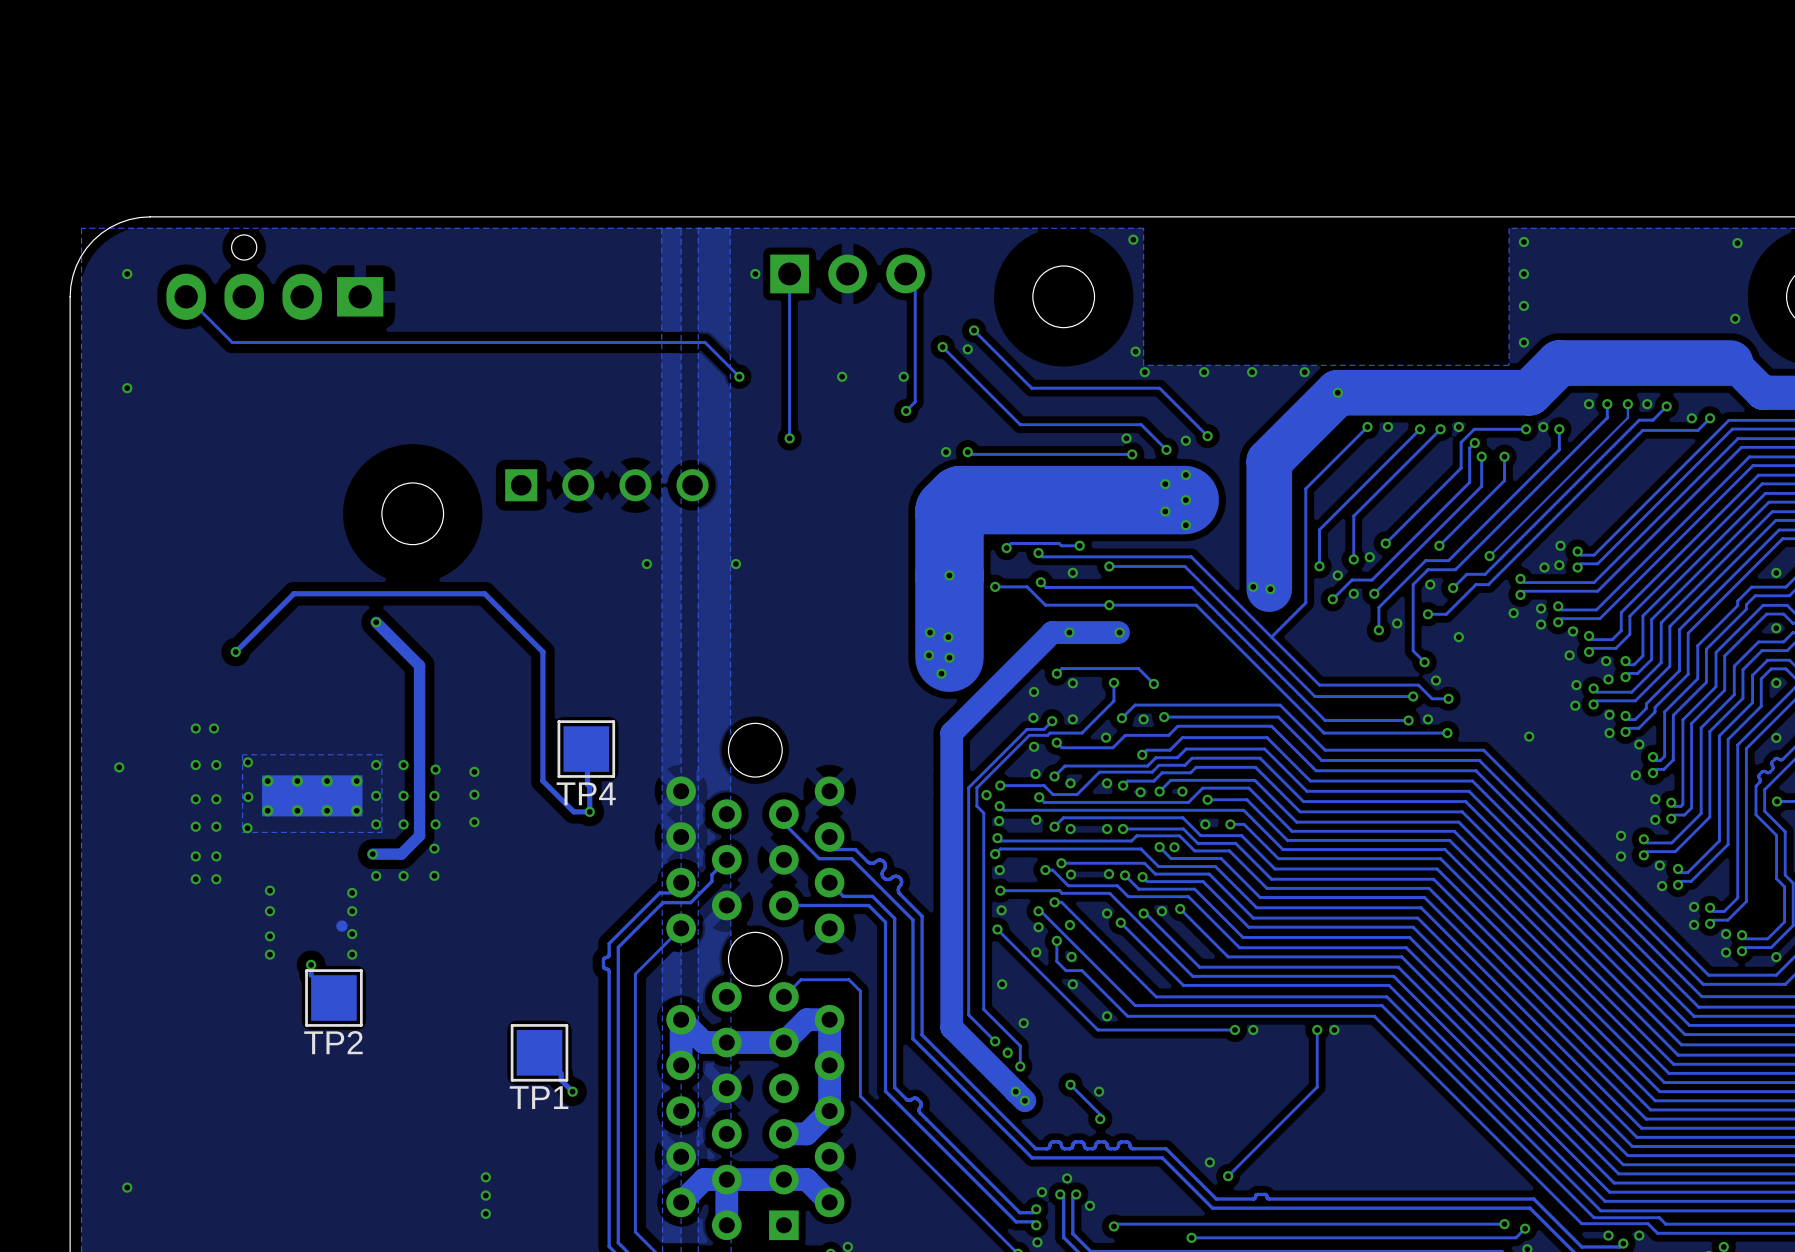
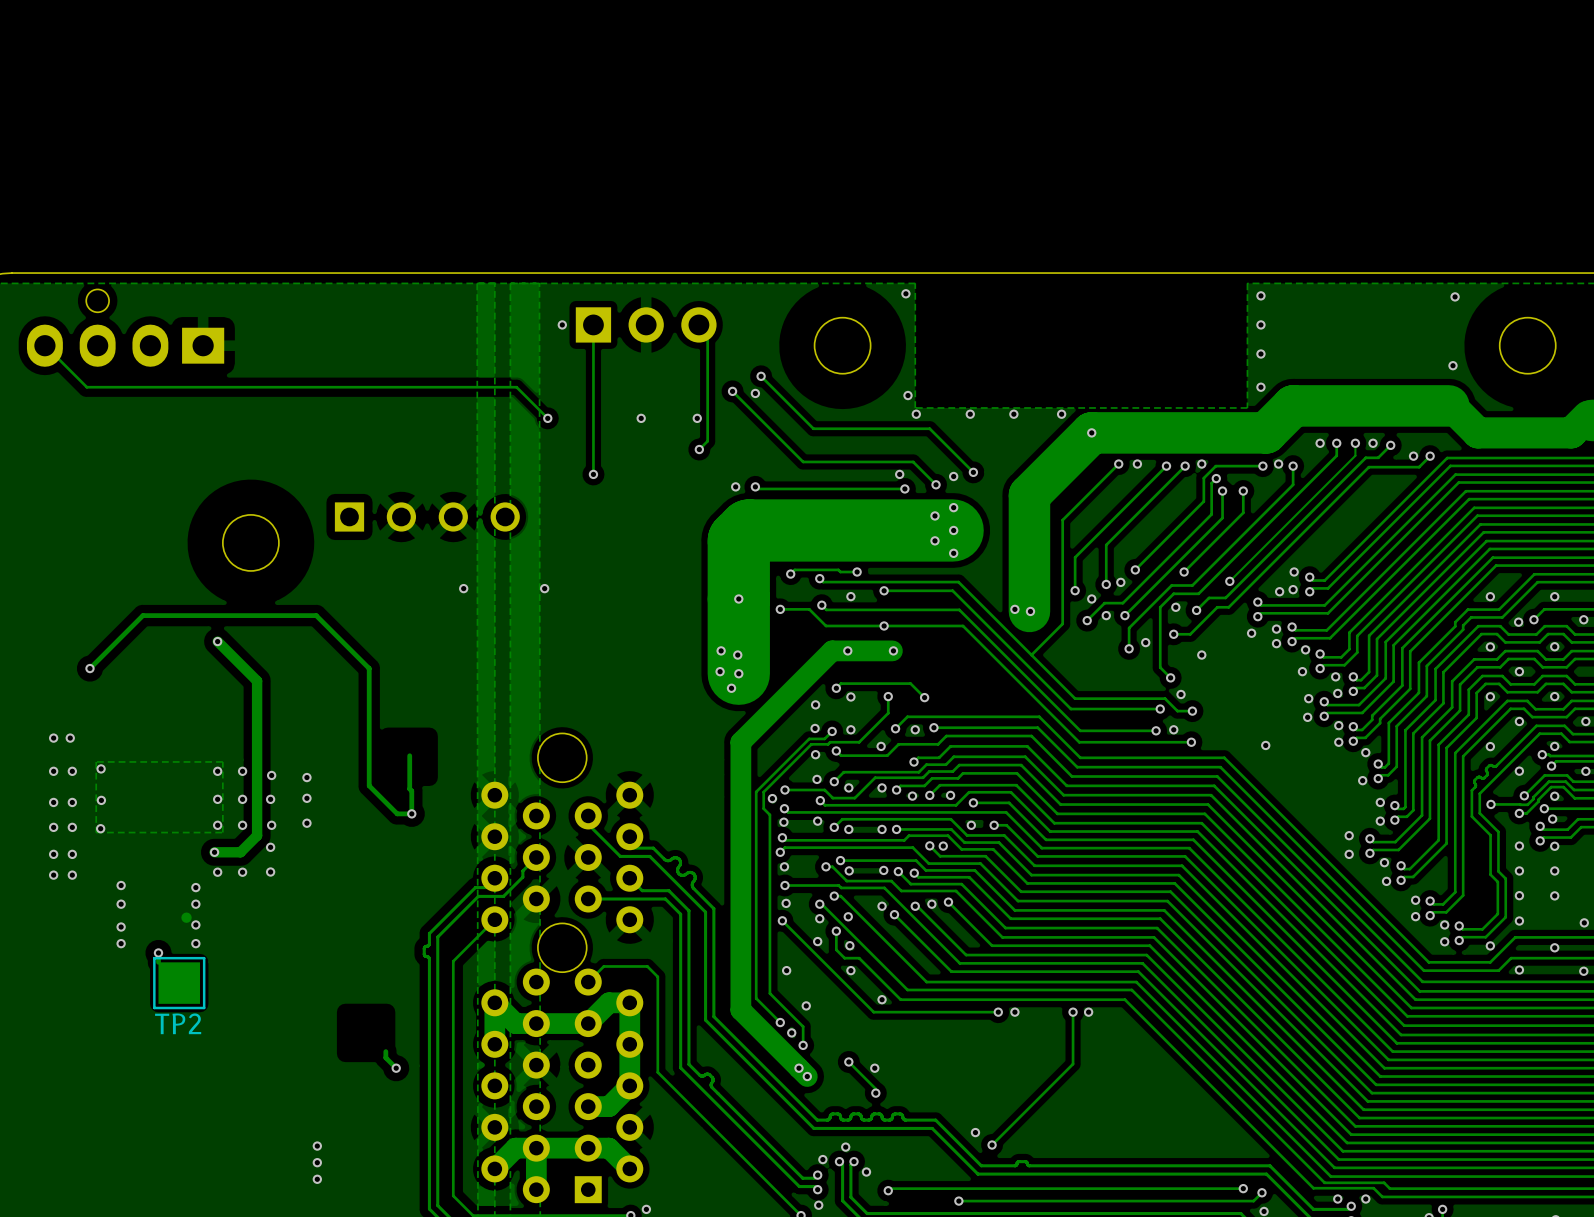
TP4: (586, 749) -> none
part: (312, 795) -> none
TP1: (539, 1052) -> none

